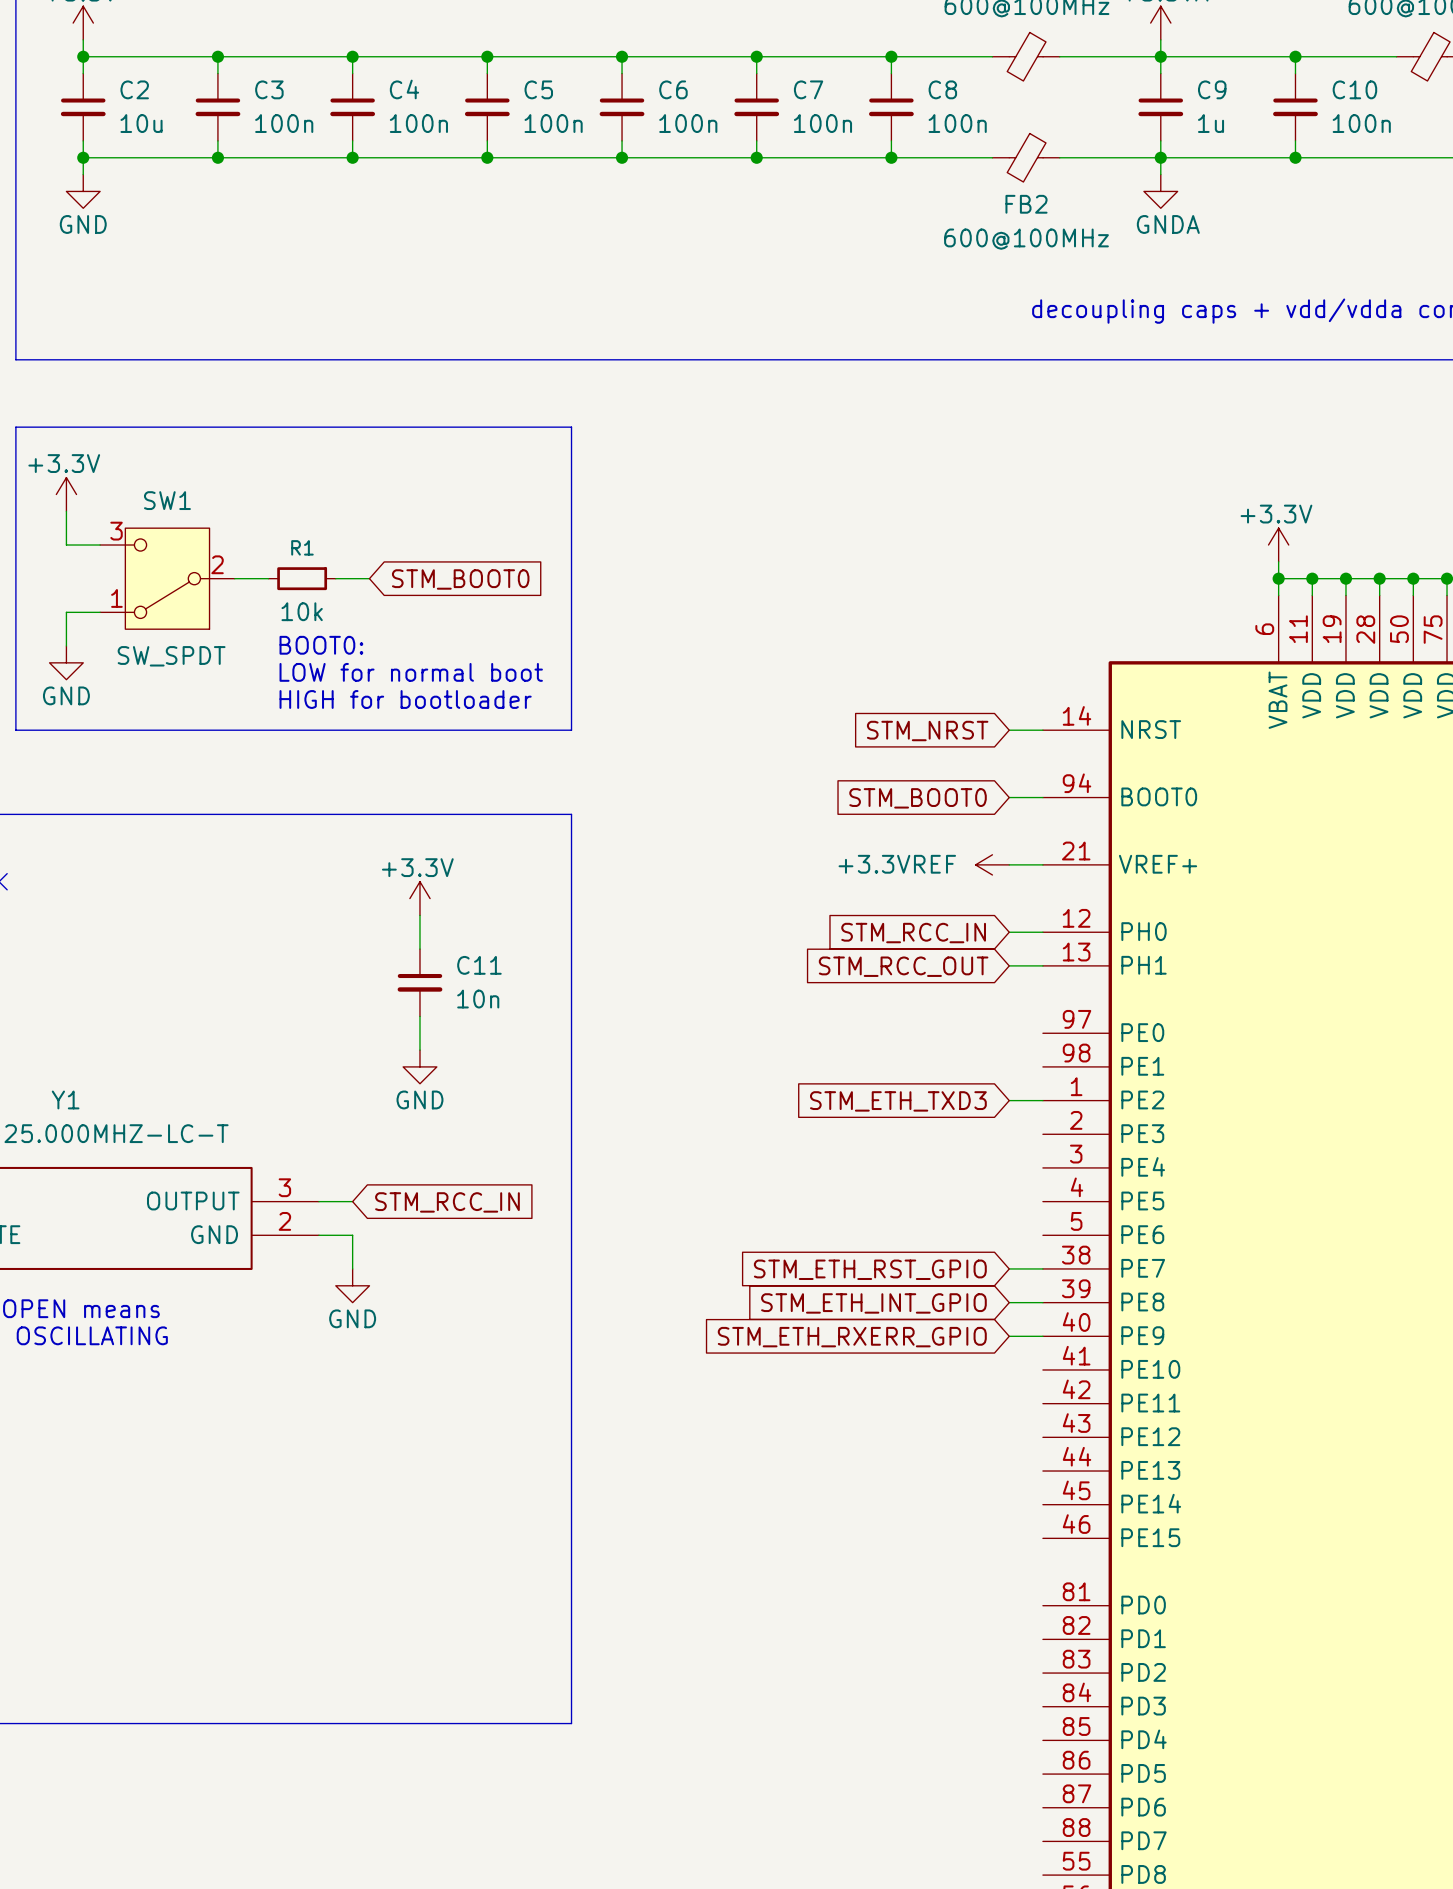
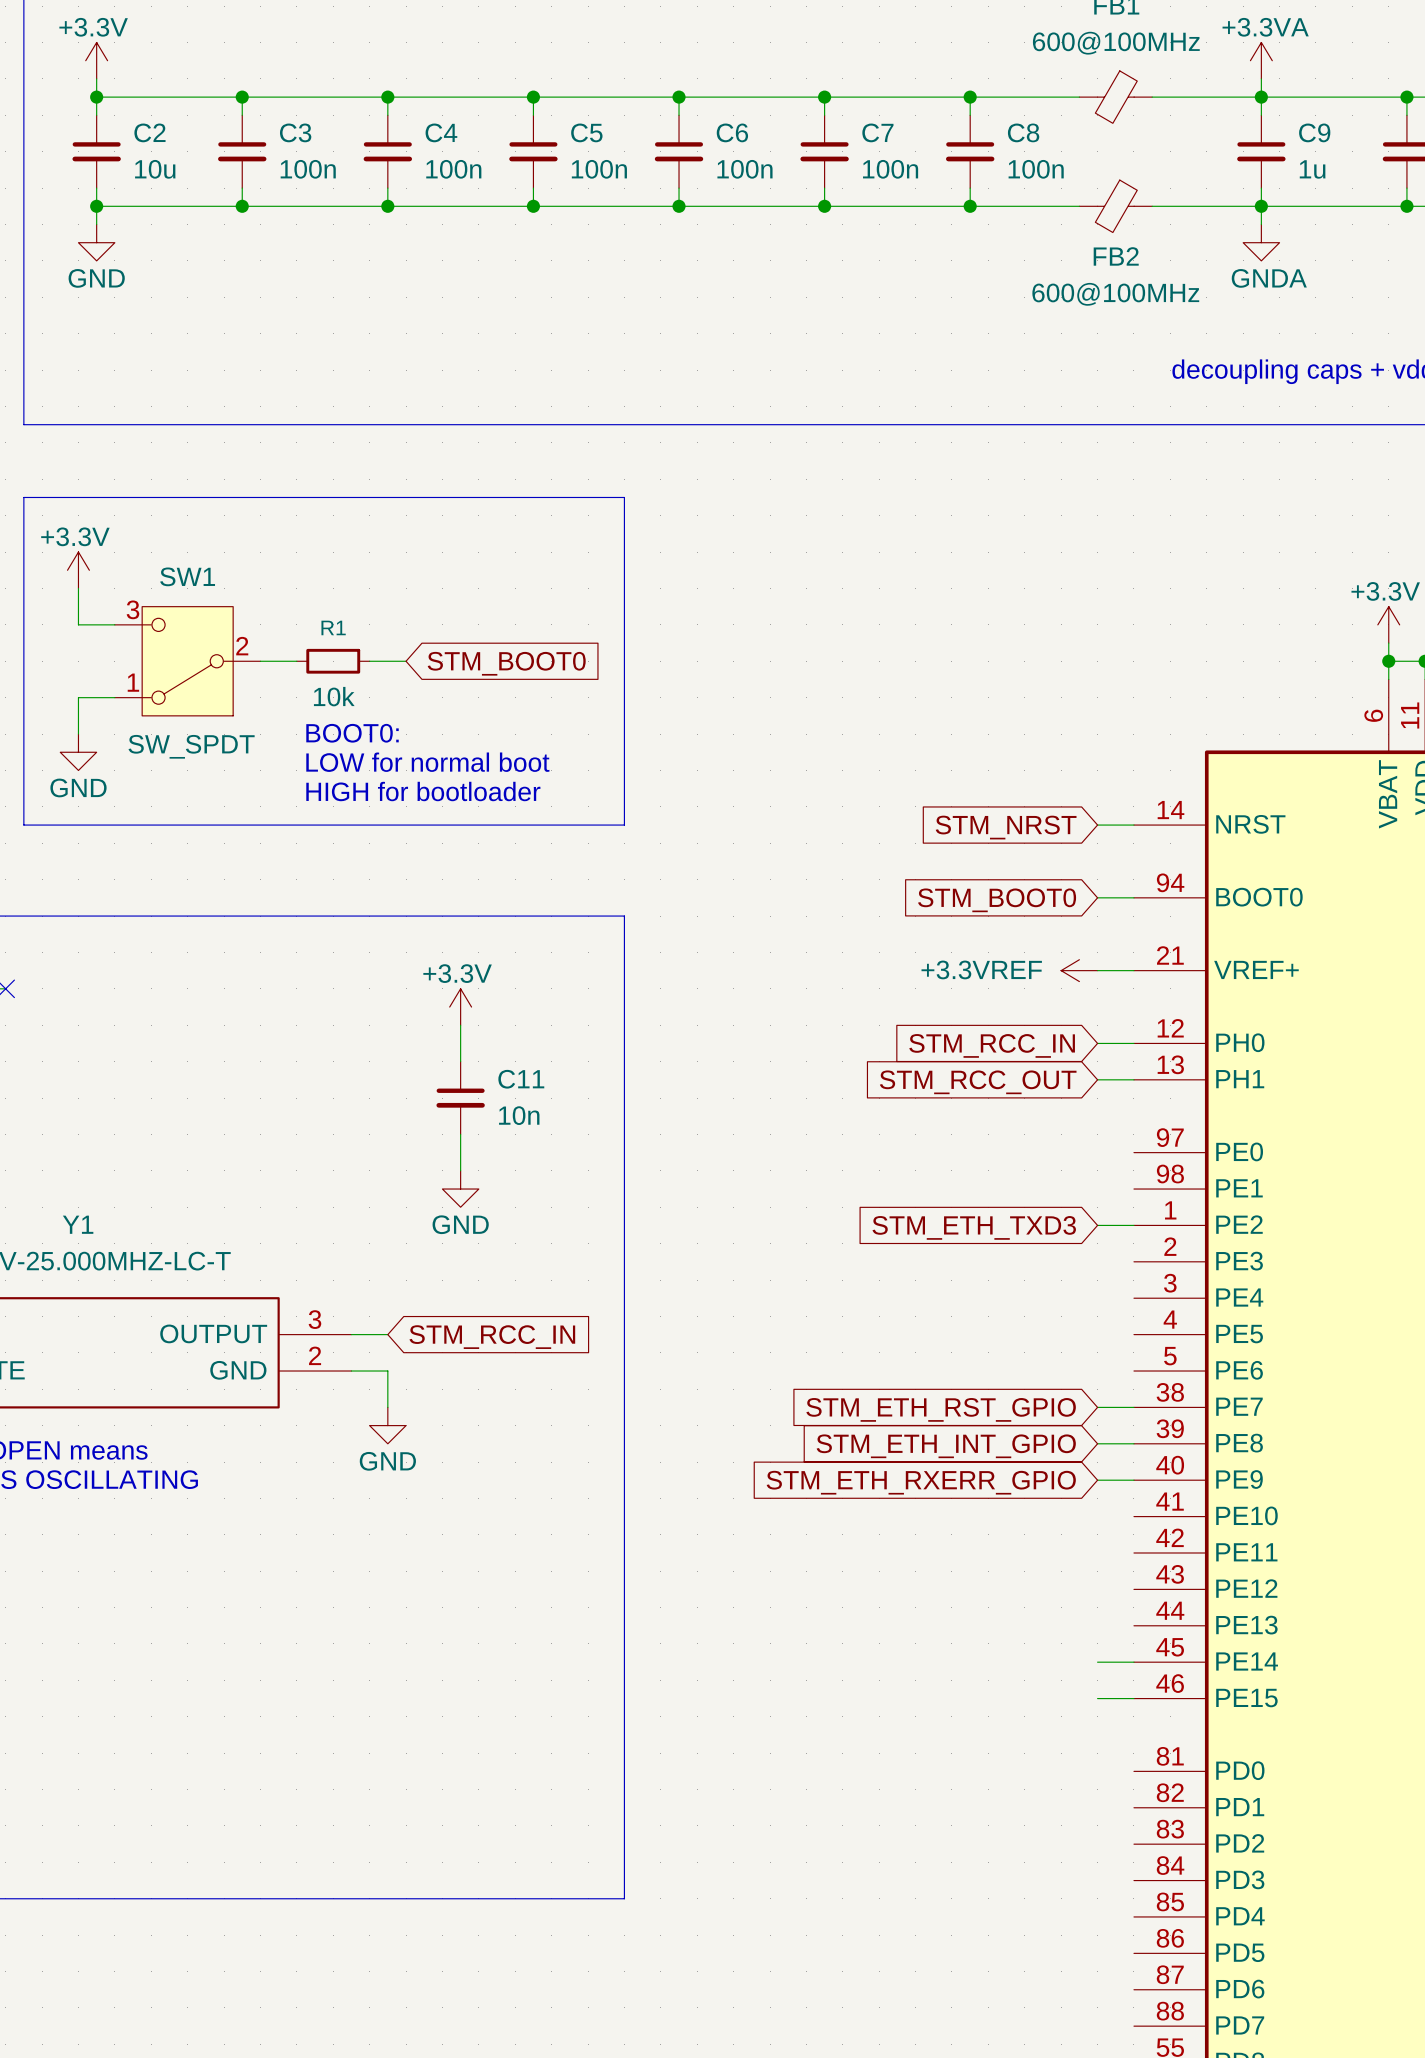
wire: none -> (1097, 1662) (1133, 1662)
wire: none -> (1097, 1698) (1133, 1698)

